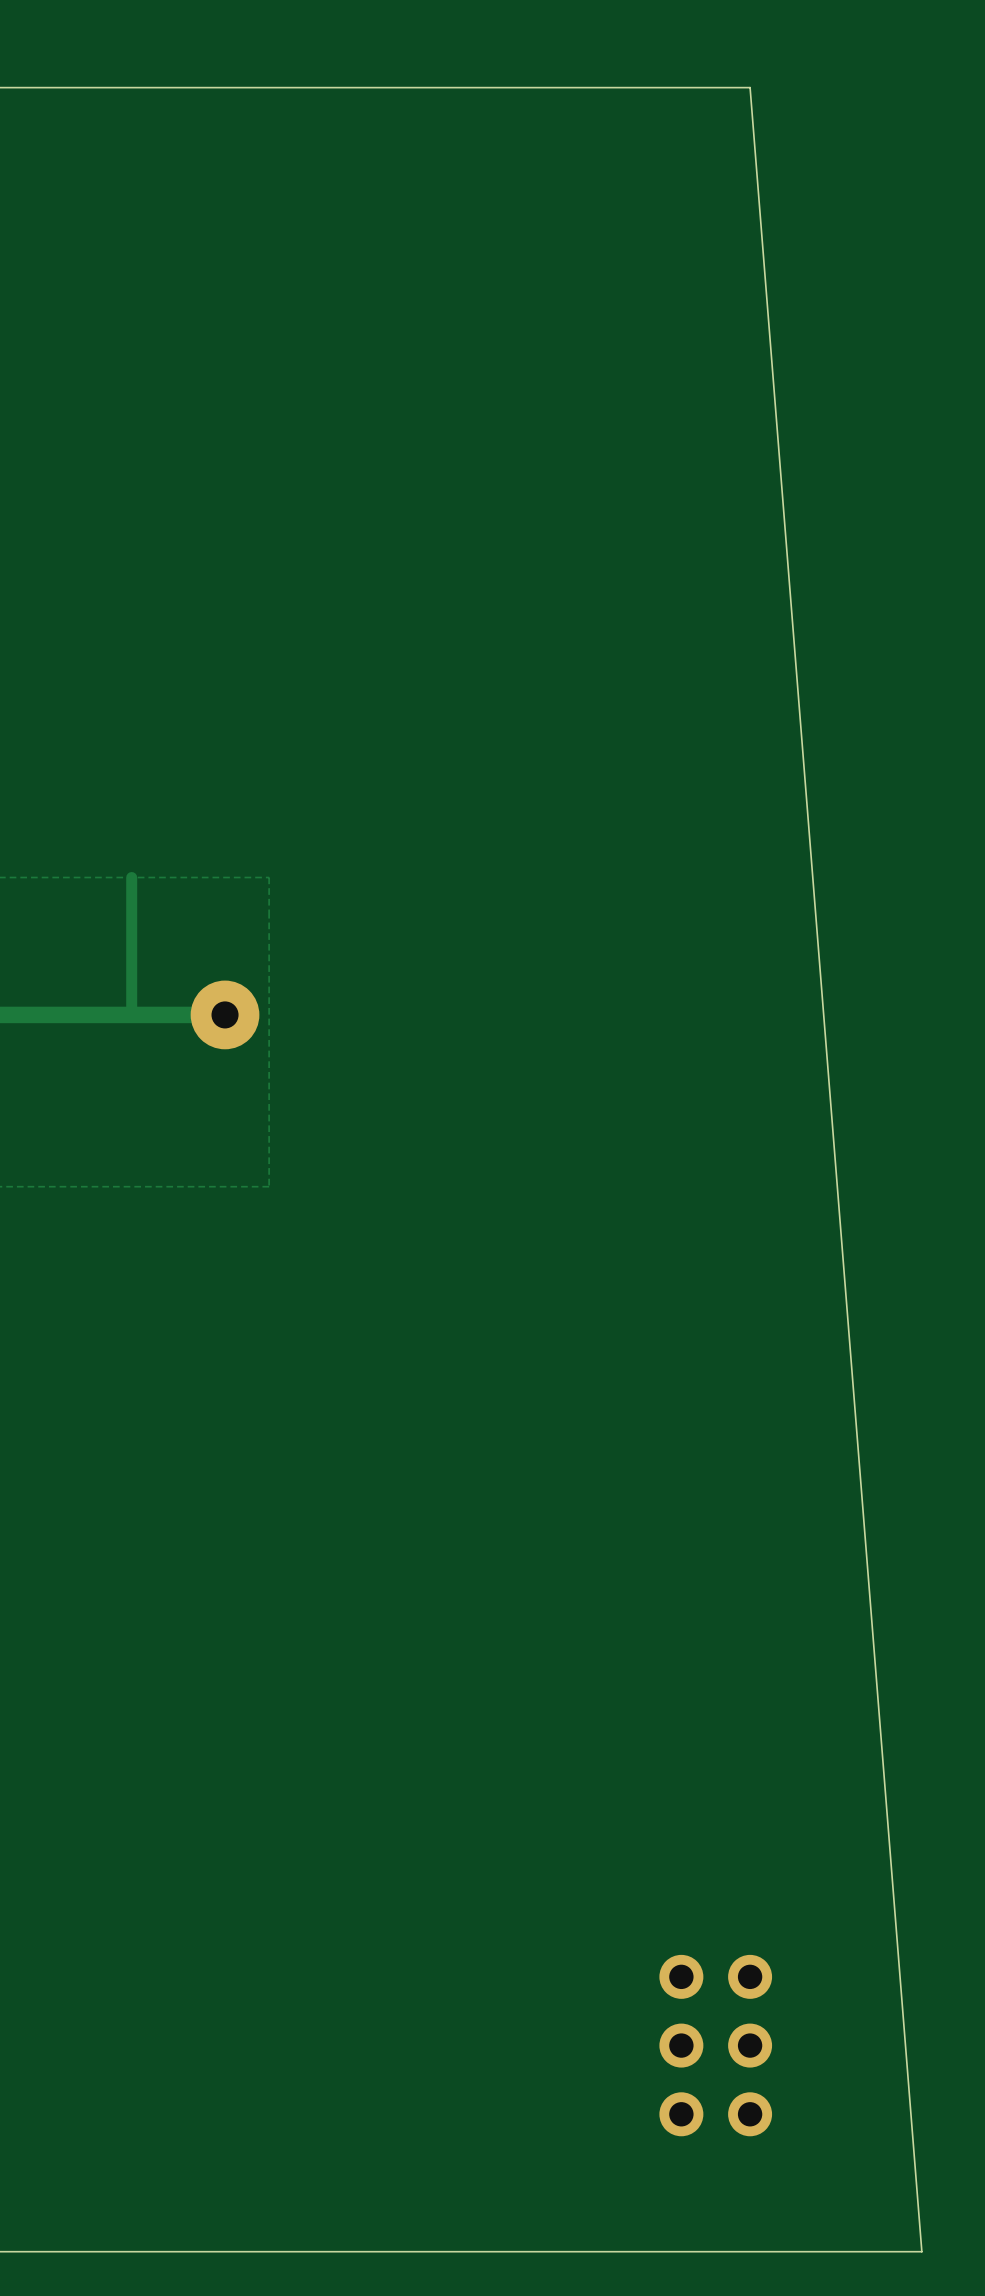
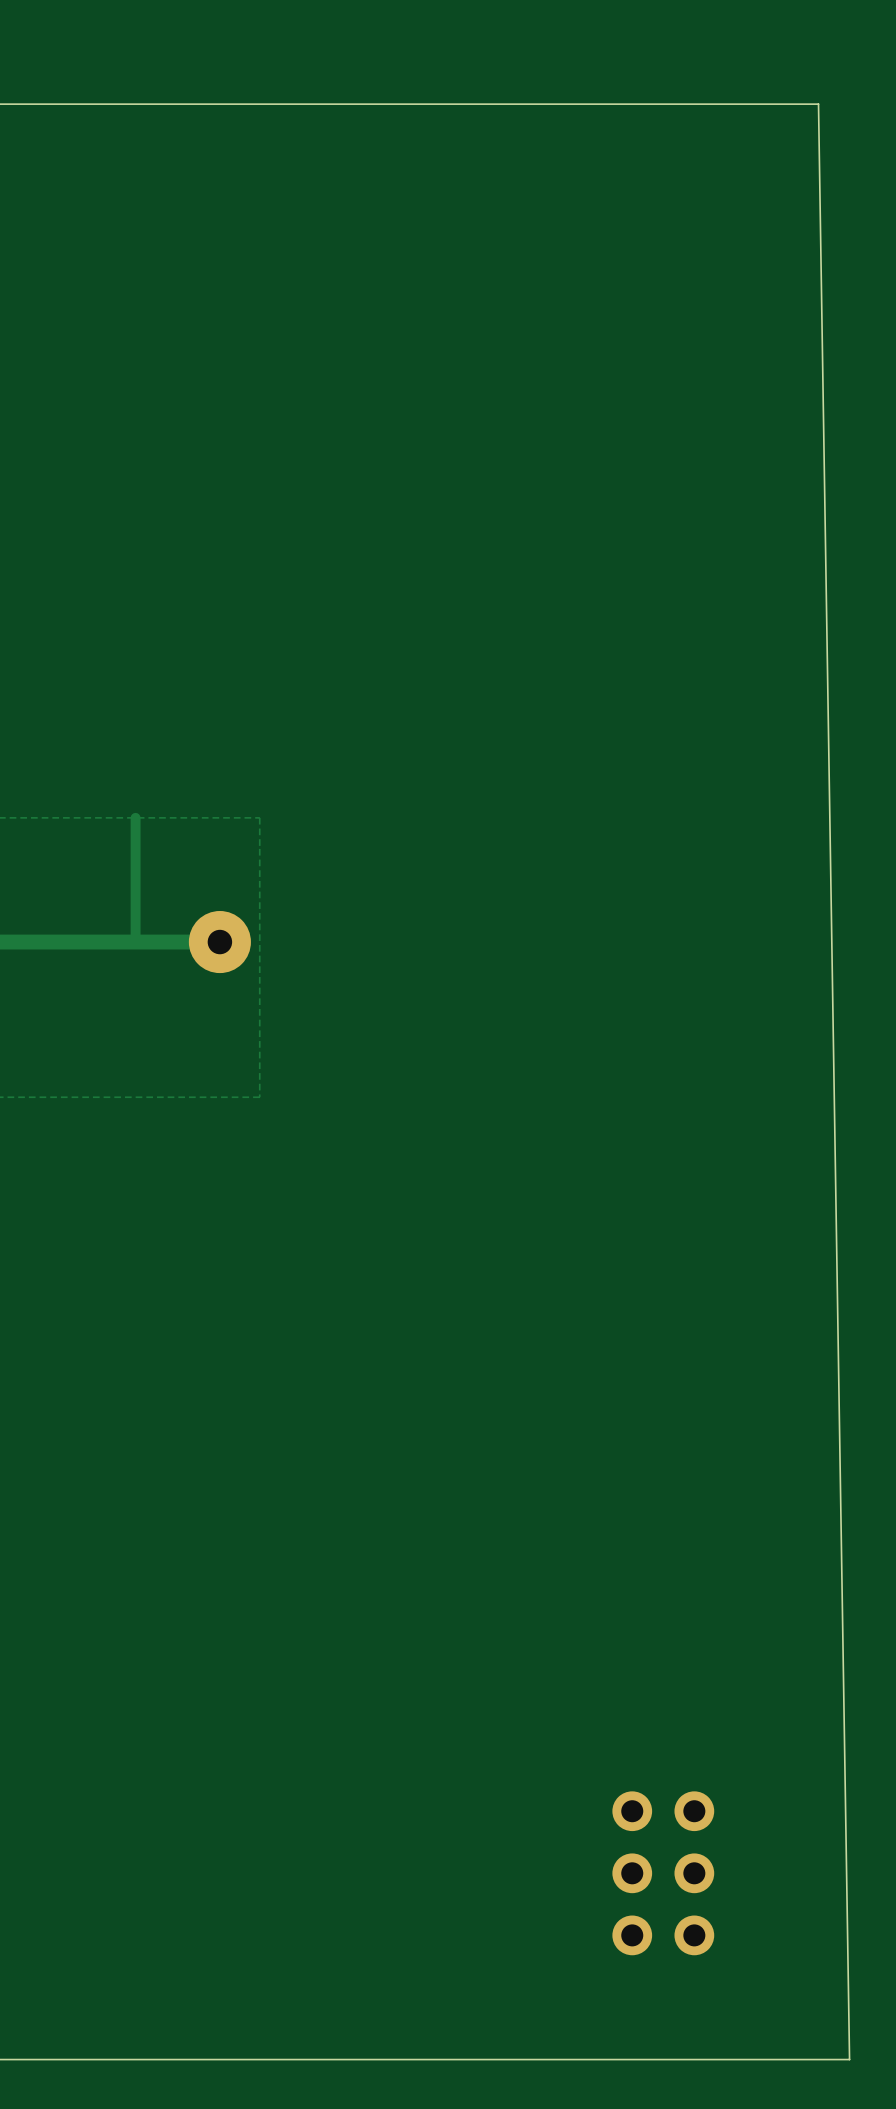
board edge: (750, 87) (921, 2251) -> (694, 104) (818, 104) (849, 2059)

